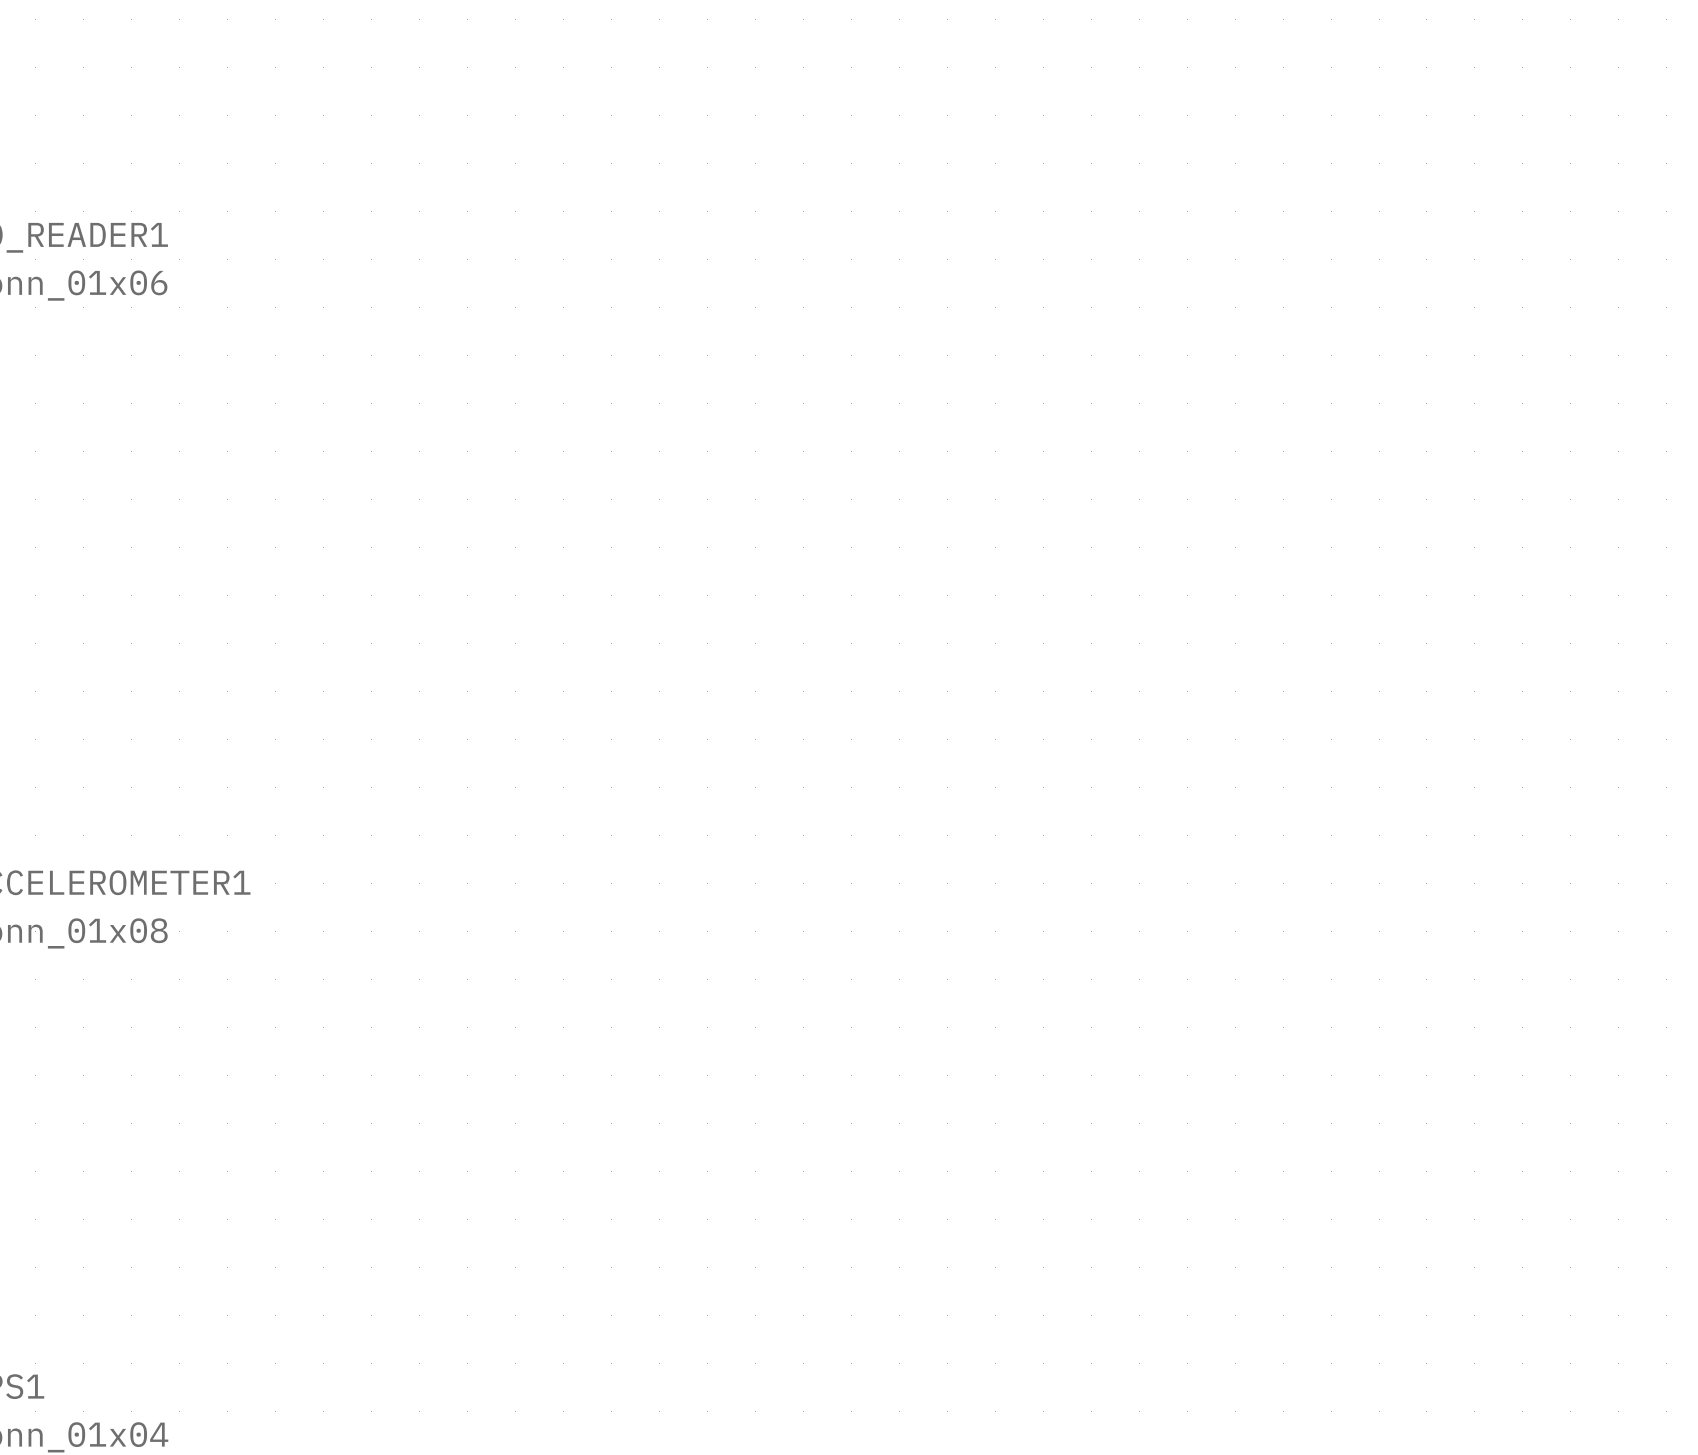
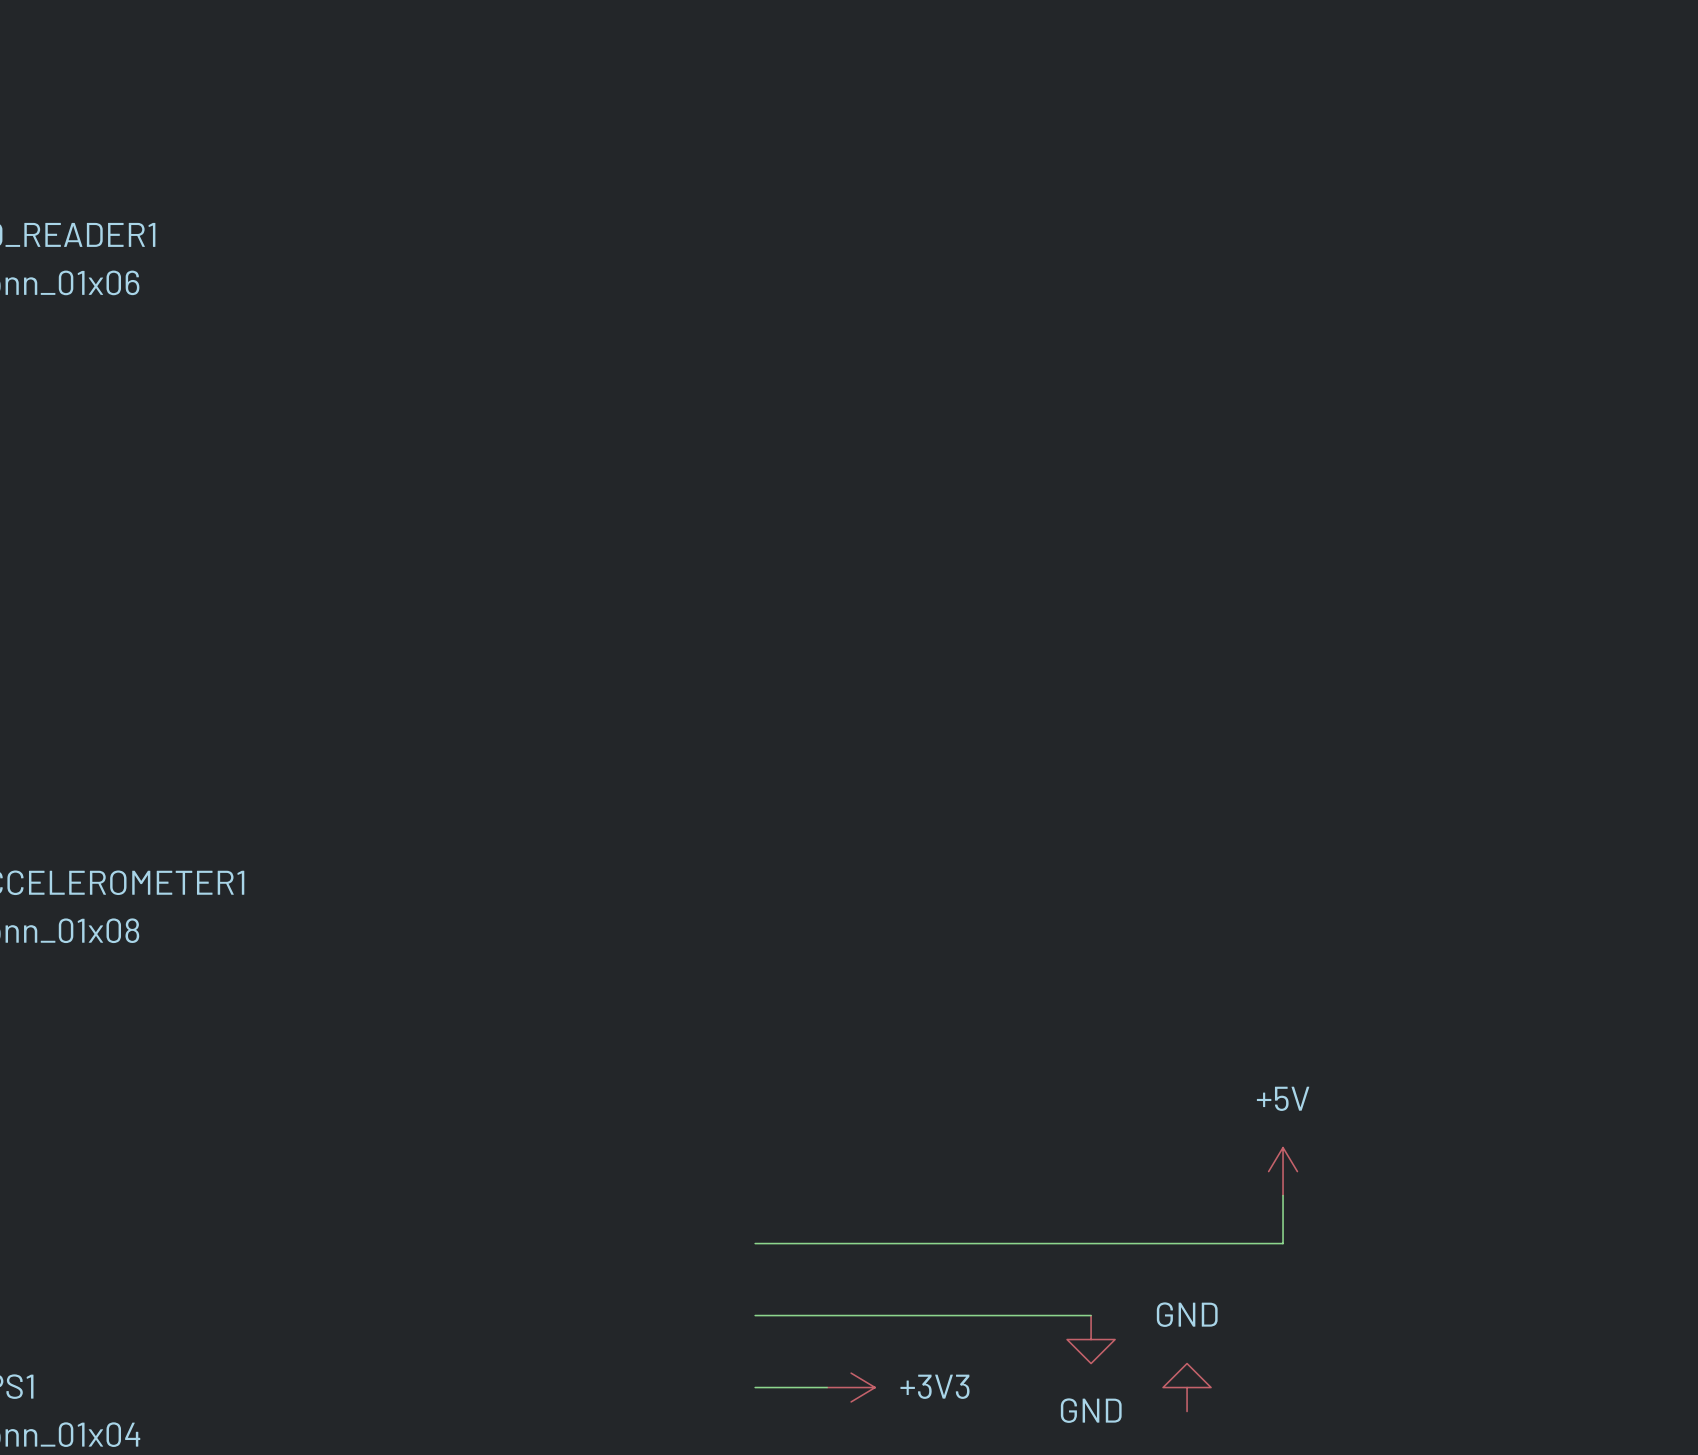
power symbol: none -> +5V (1283, 1171)
wire: none -> (1283, 1195) (1283, 1243) (755, 1243)
wire: none -> (755, 1315) (1091, 1315)
power symbol: none -> GND (1091, 1339)
wire: none -> (755, 1387) (827, 1387)
power symbol: none -> +3V3 (851, 1387)
power symbol: none -> GND (1187, 1387)

